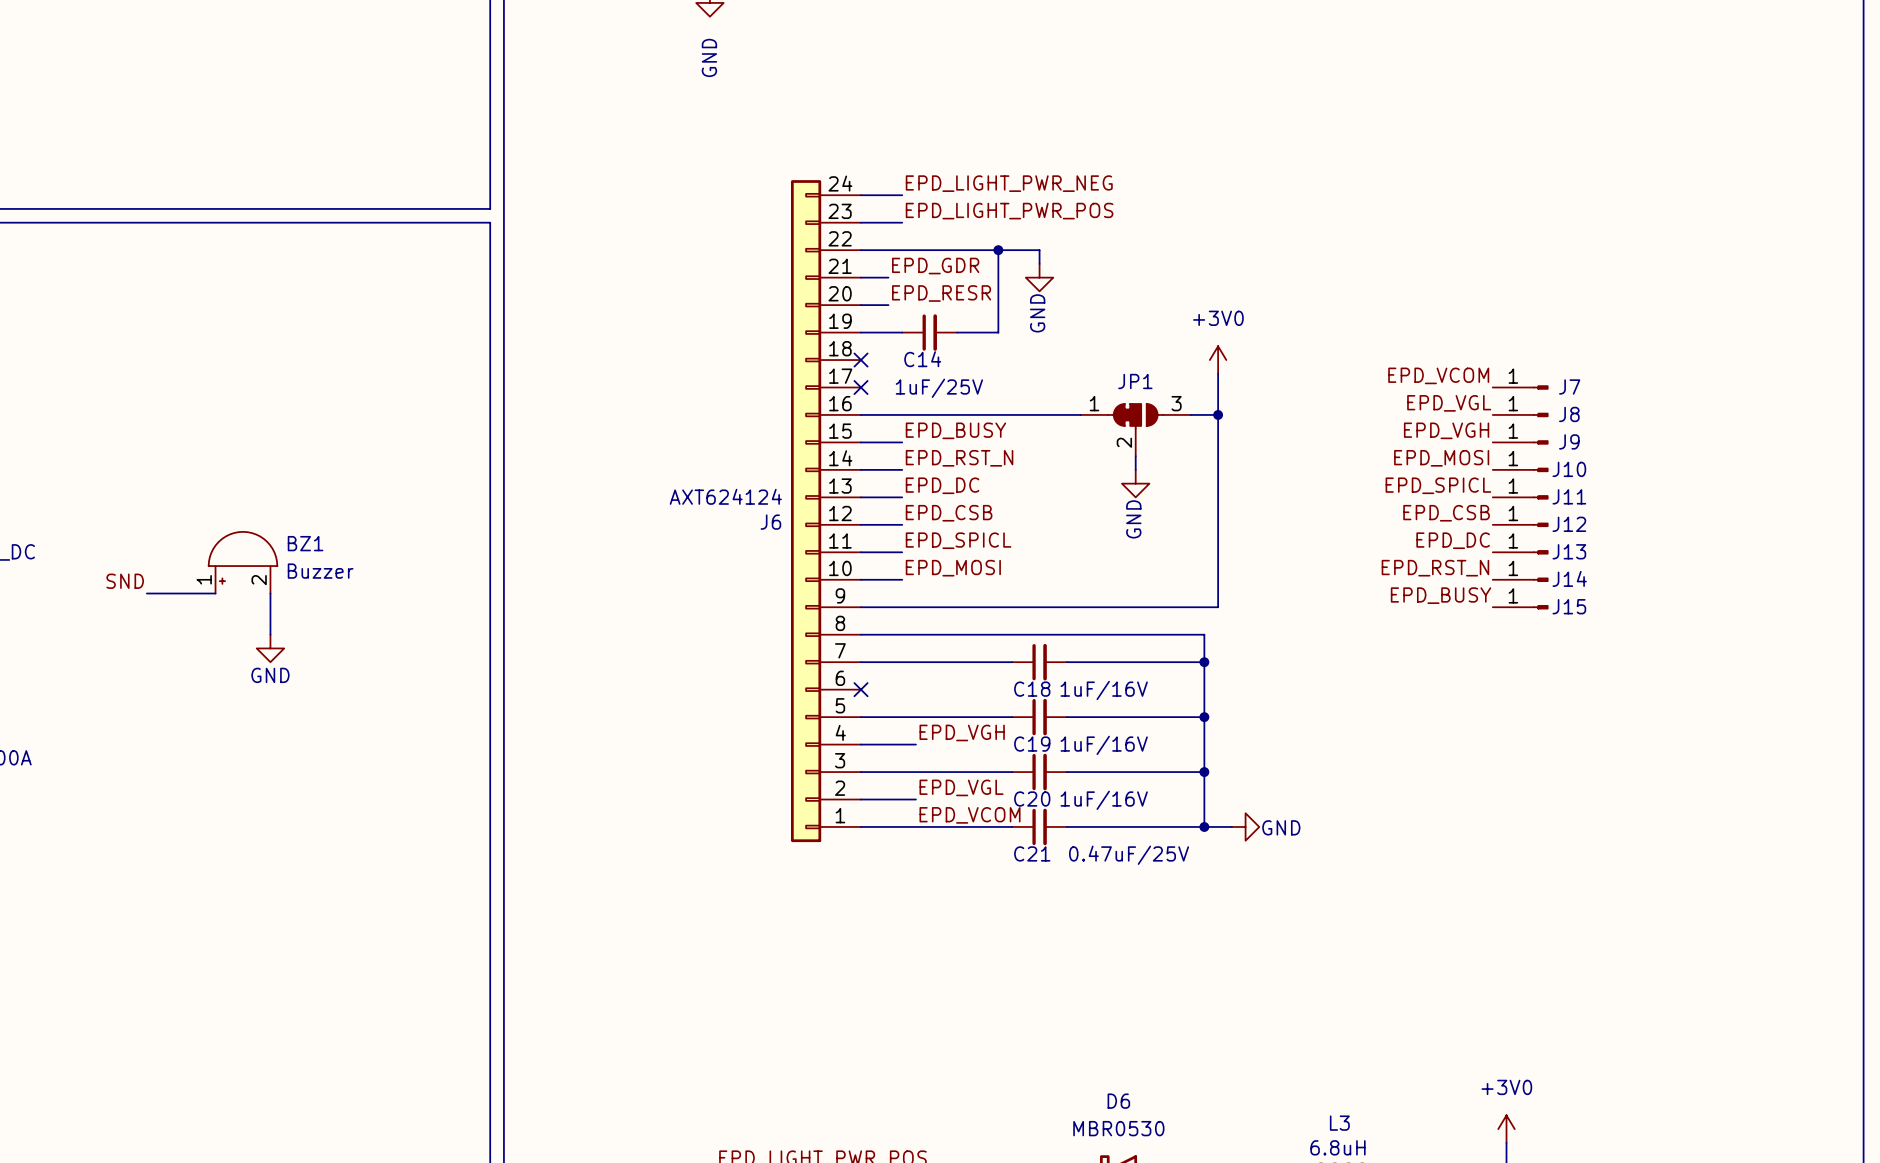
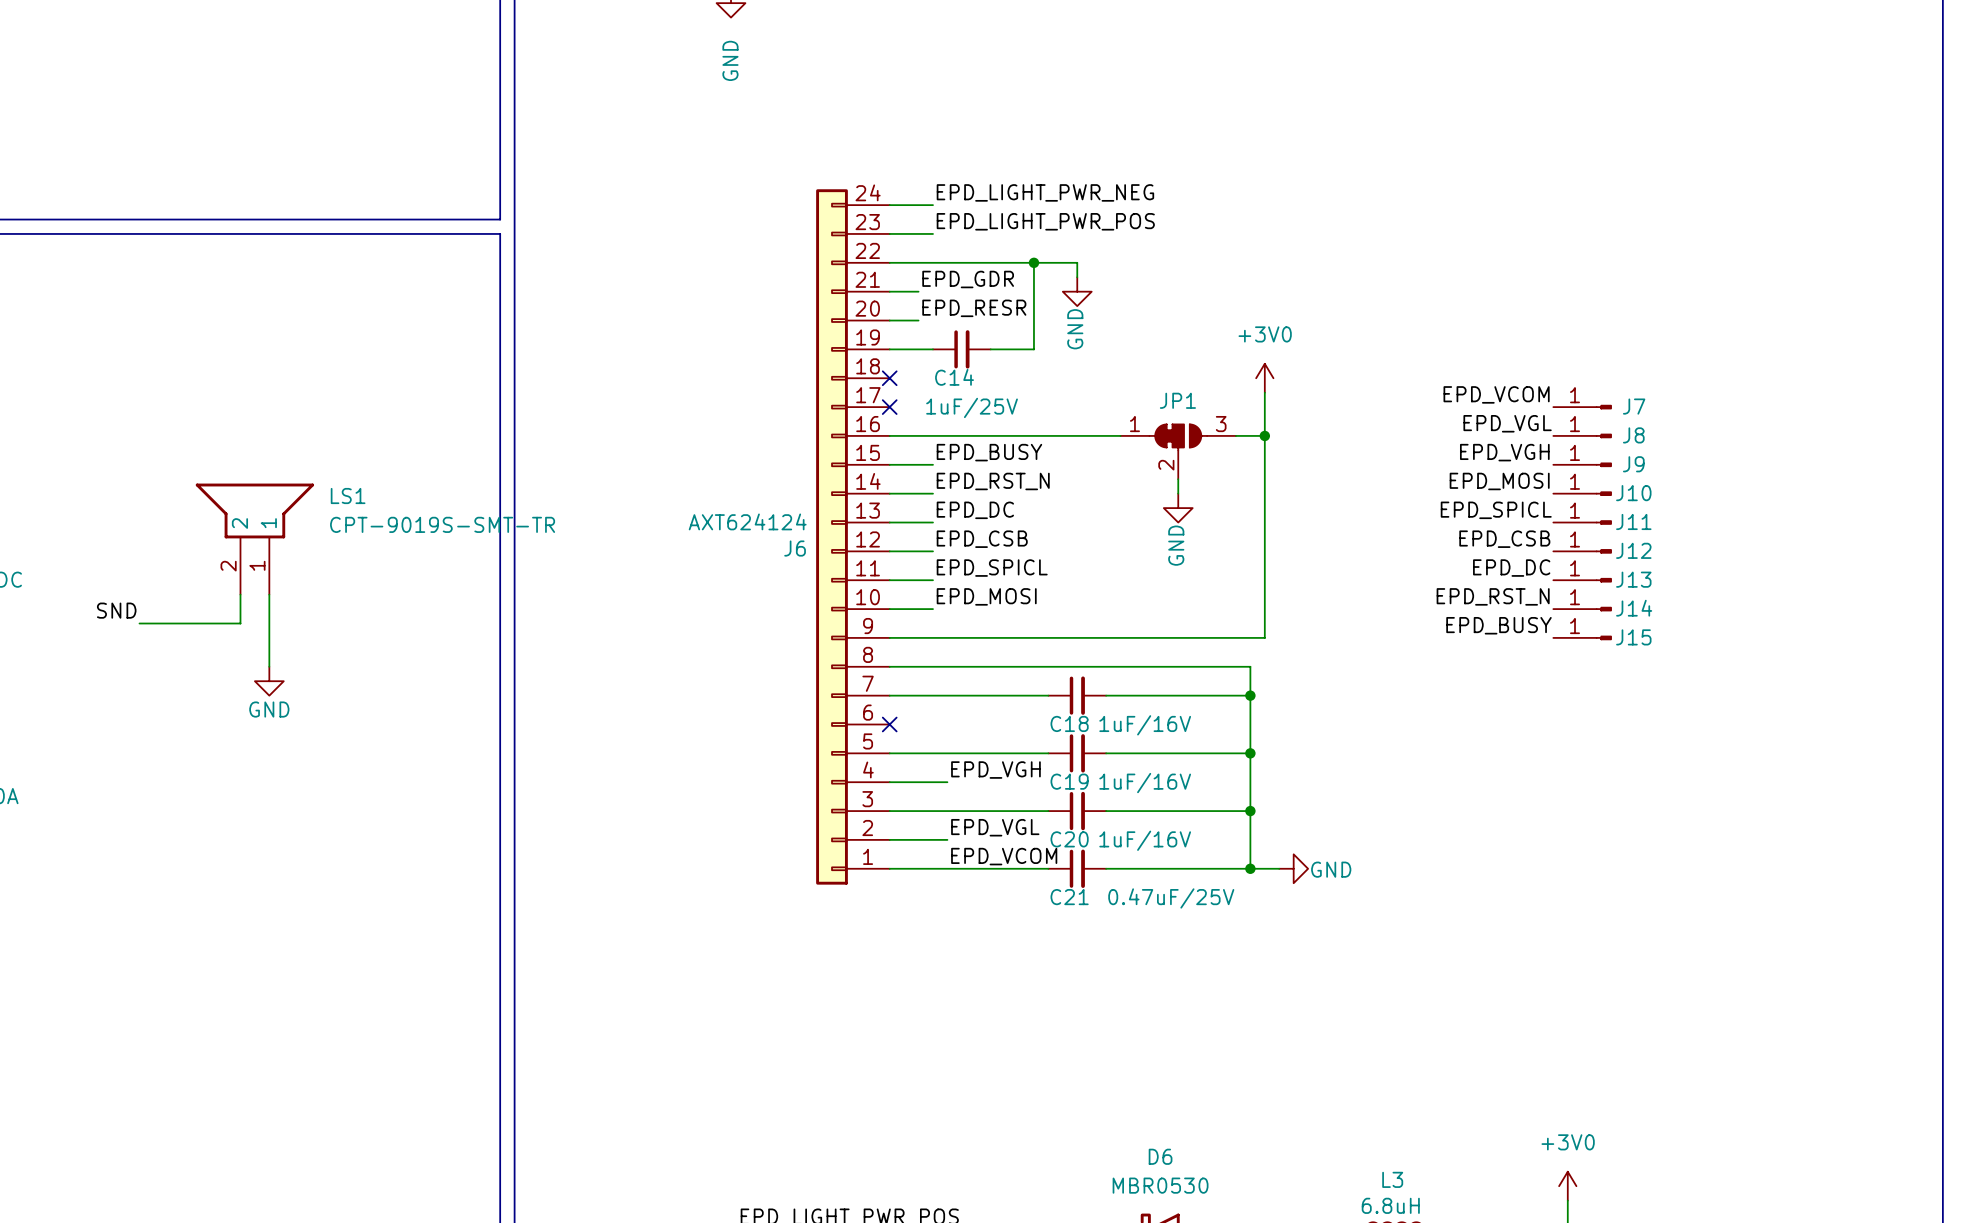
LS1: none -> CPT-9019S-SMT-TR (254, 539)
BZ1: Buzzer (242, 562) -> none
wire: none -> (240, 594) (240, 623) (211, 623)

